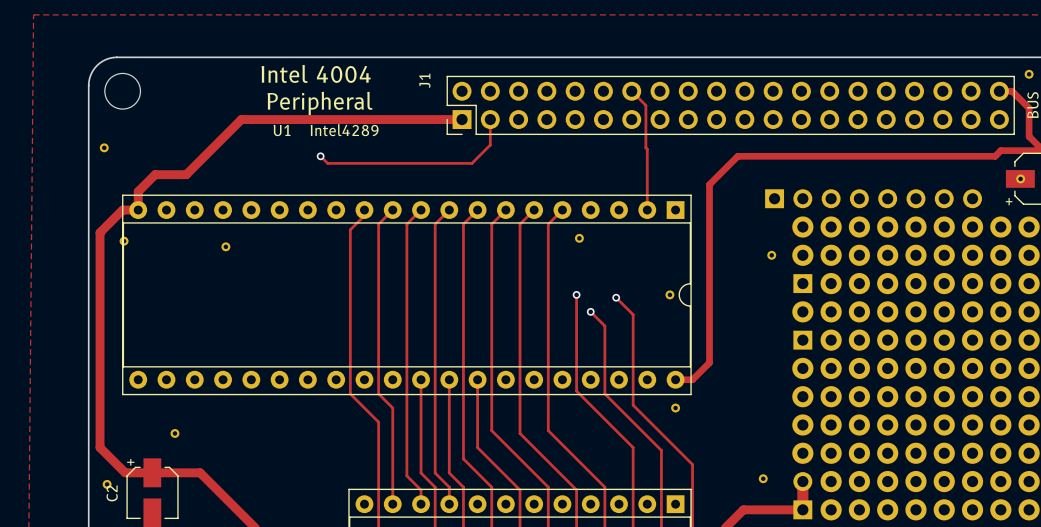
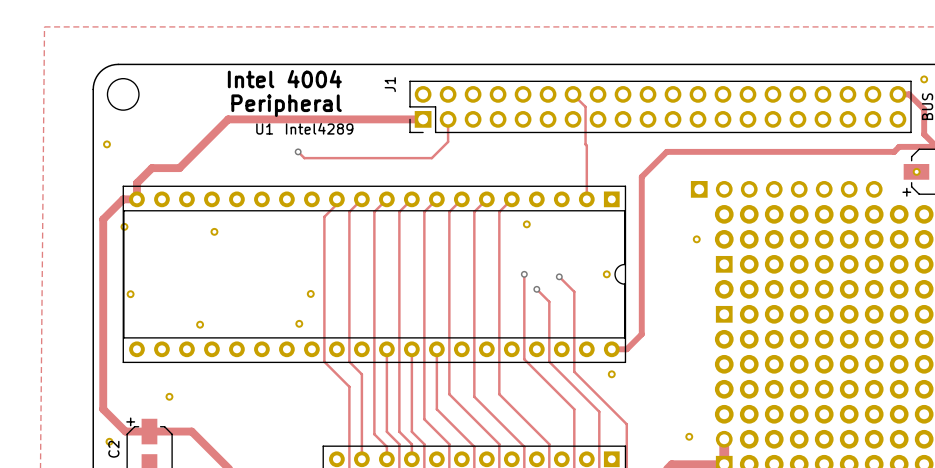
part: none -> (130, 294)
part: none -> (310, 293)
part: none -> (299, 323)
part: none -> (200, 324)

